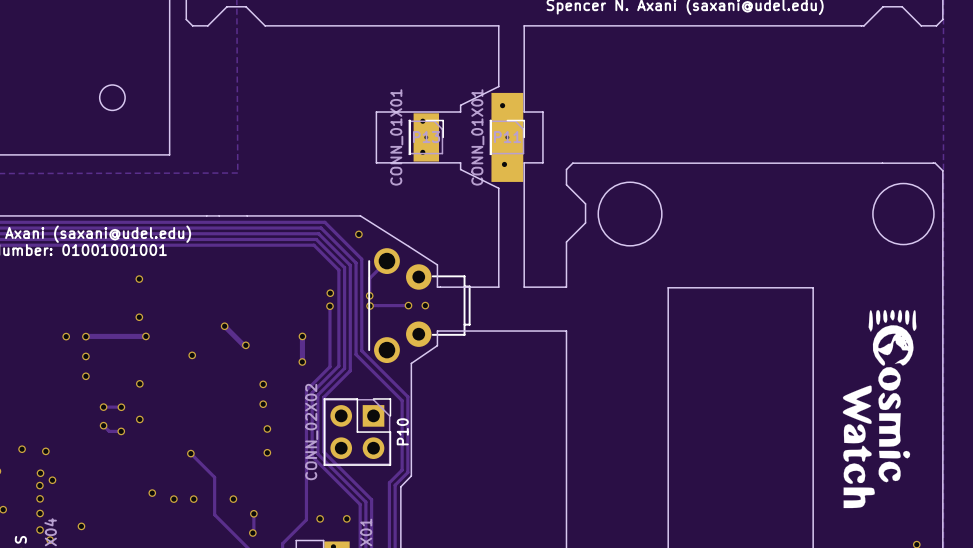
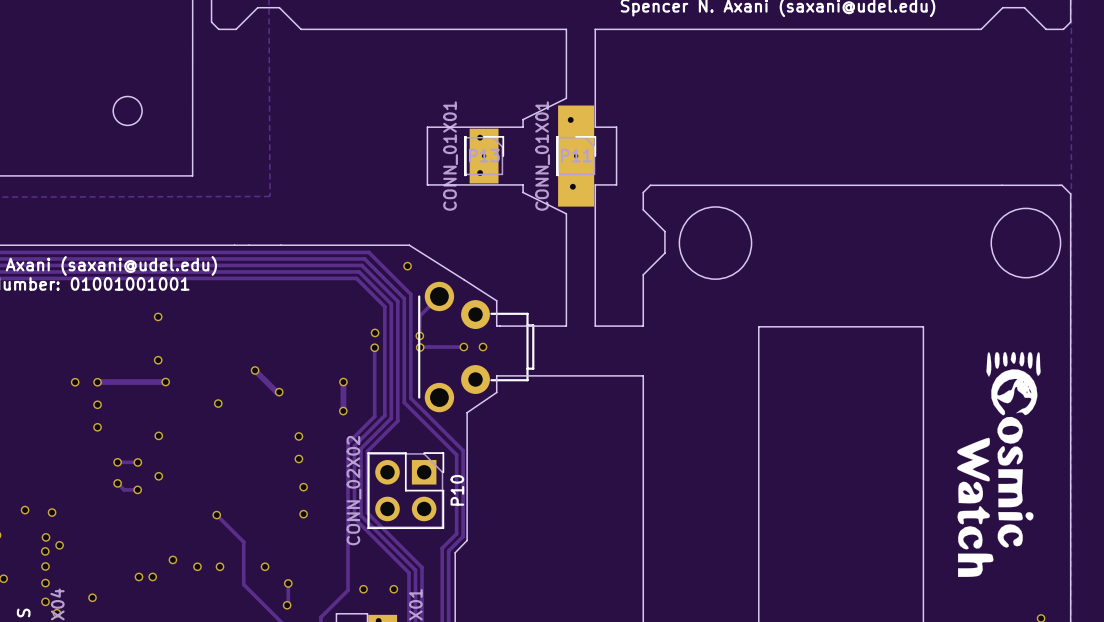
via: none -> (138, 576)
via: none -> (152, 576)

